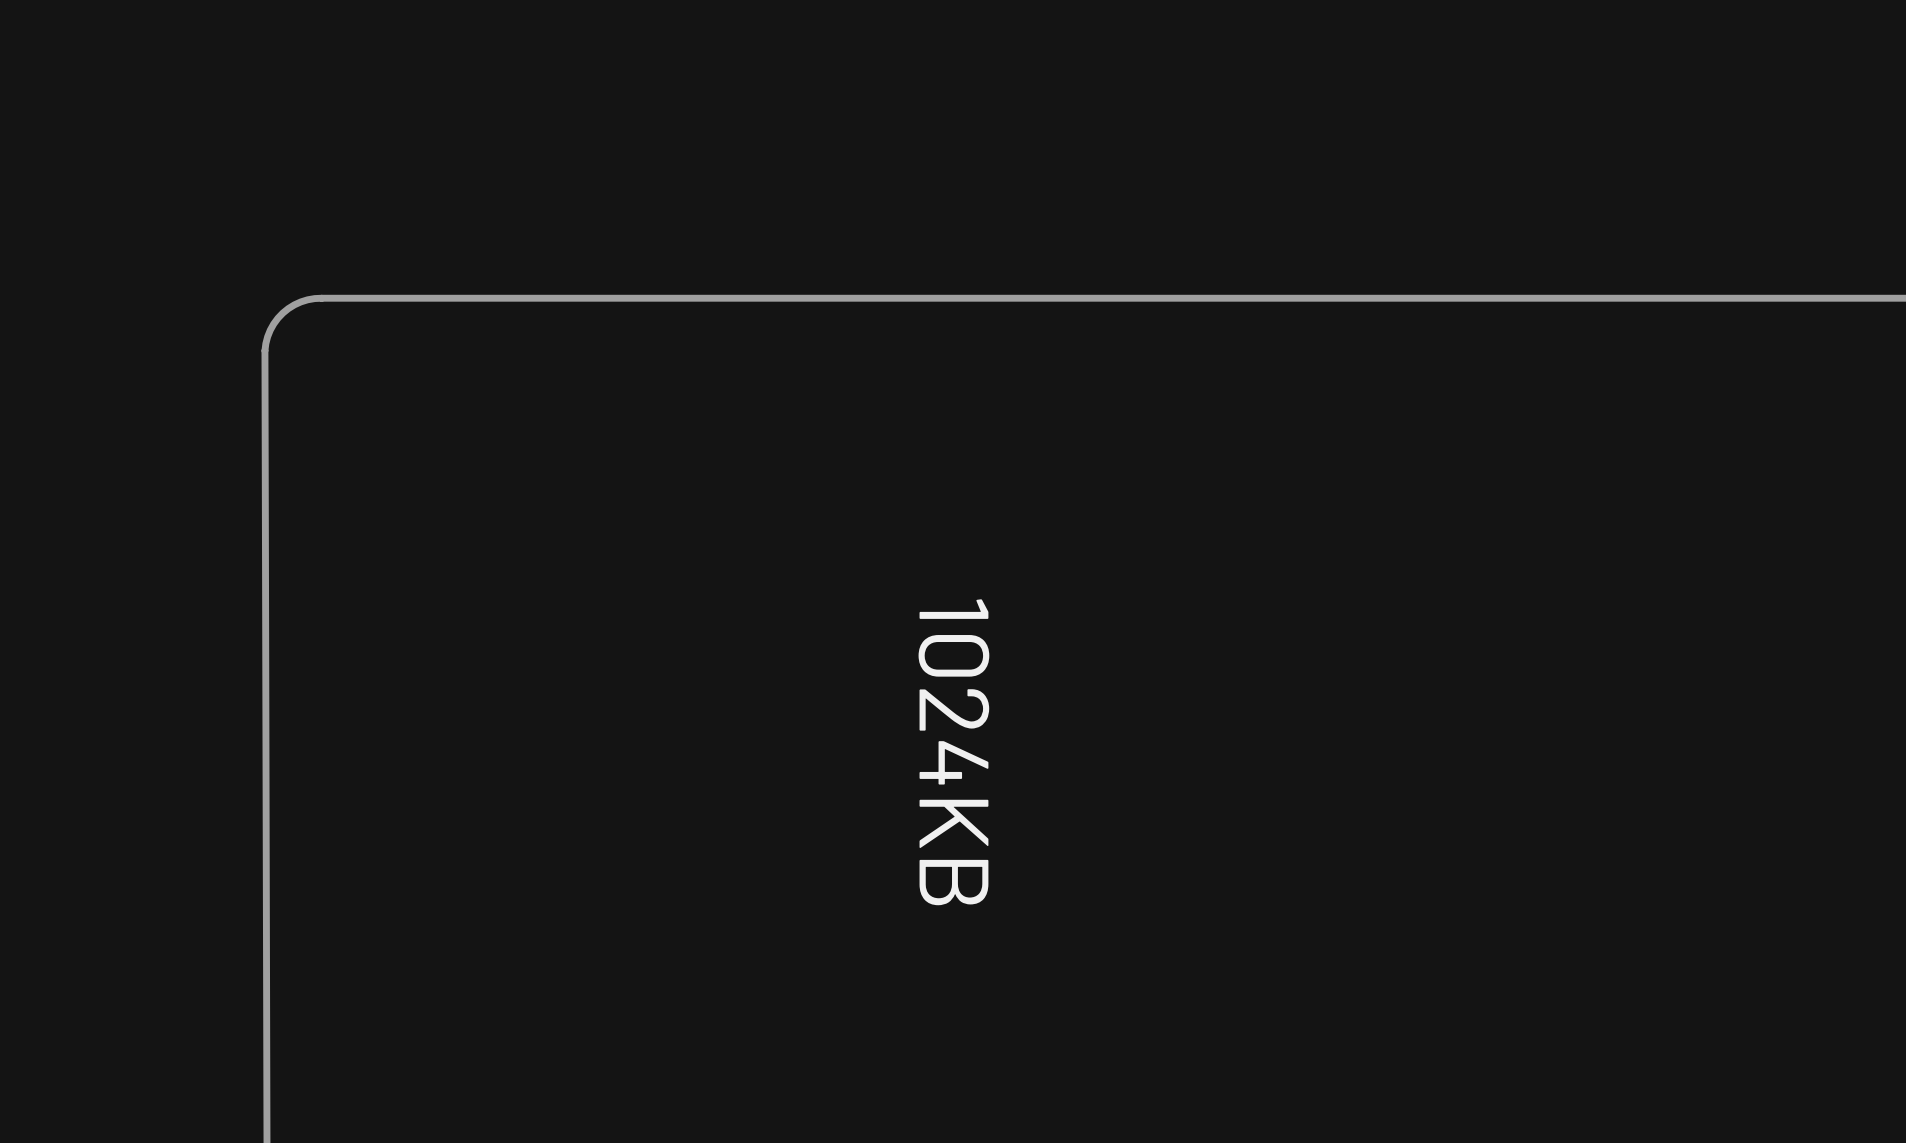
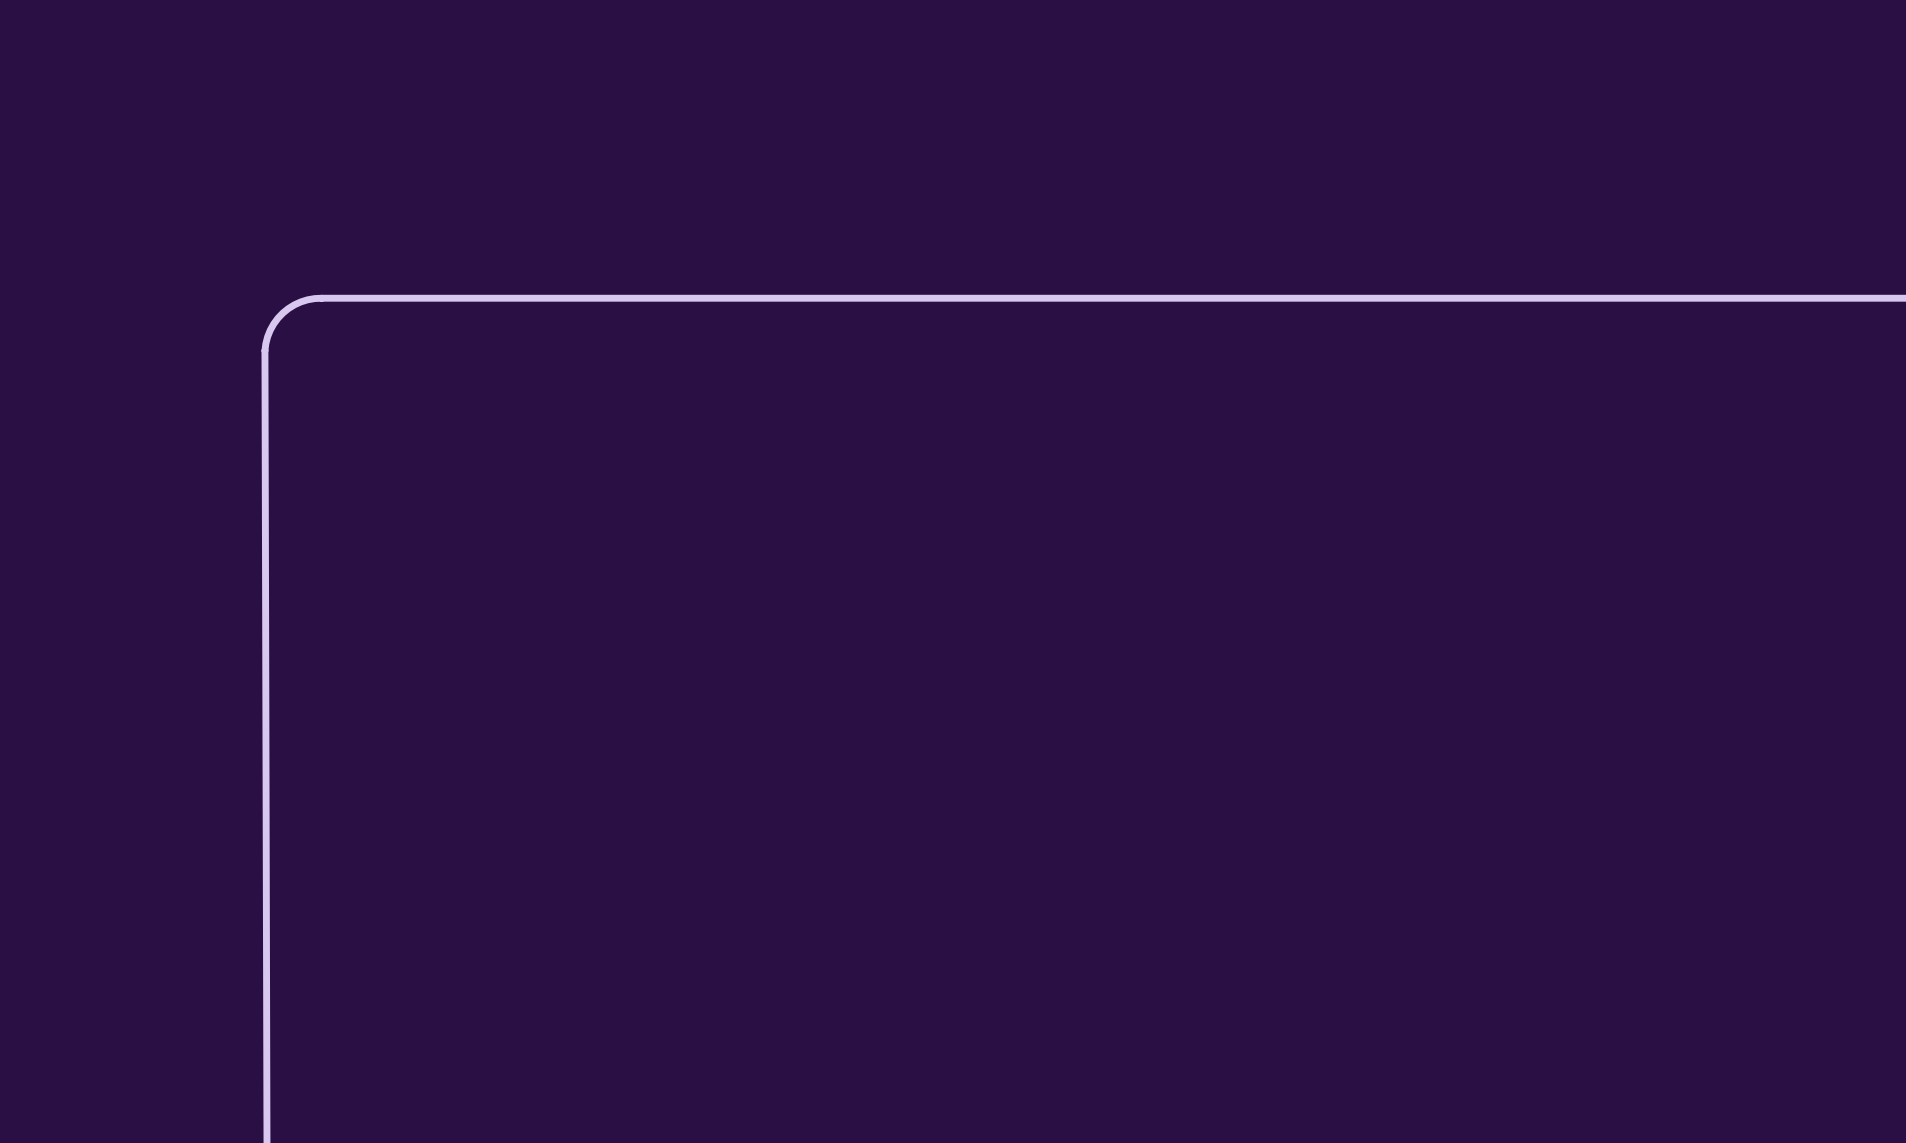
text: 1024KB (953, 752) -> none

